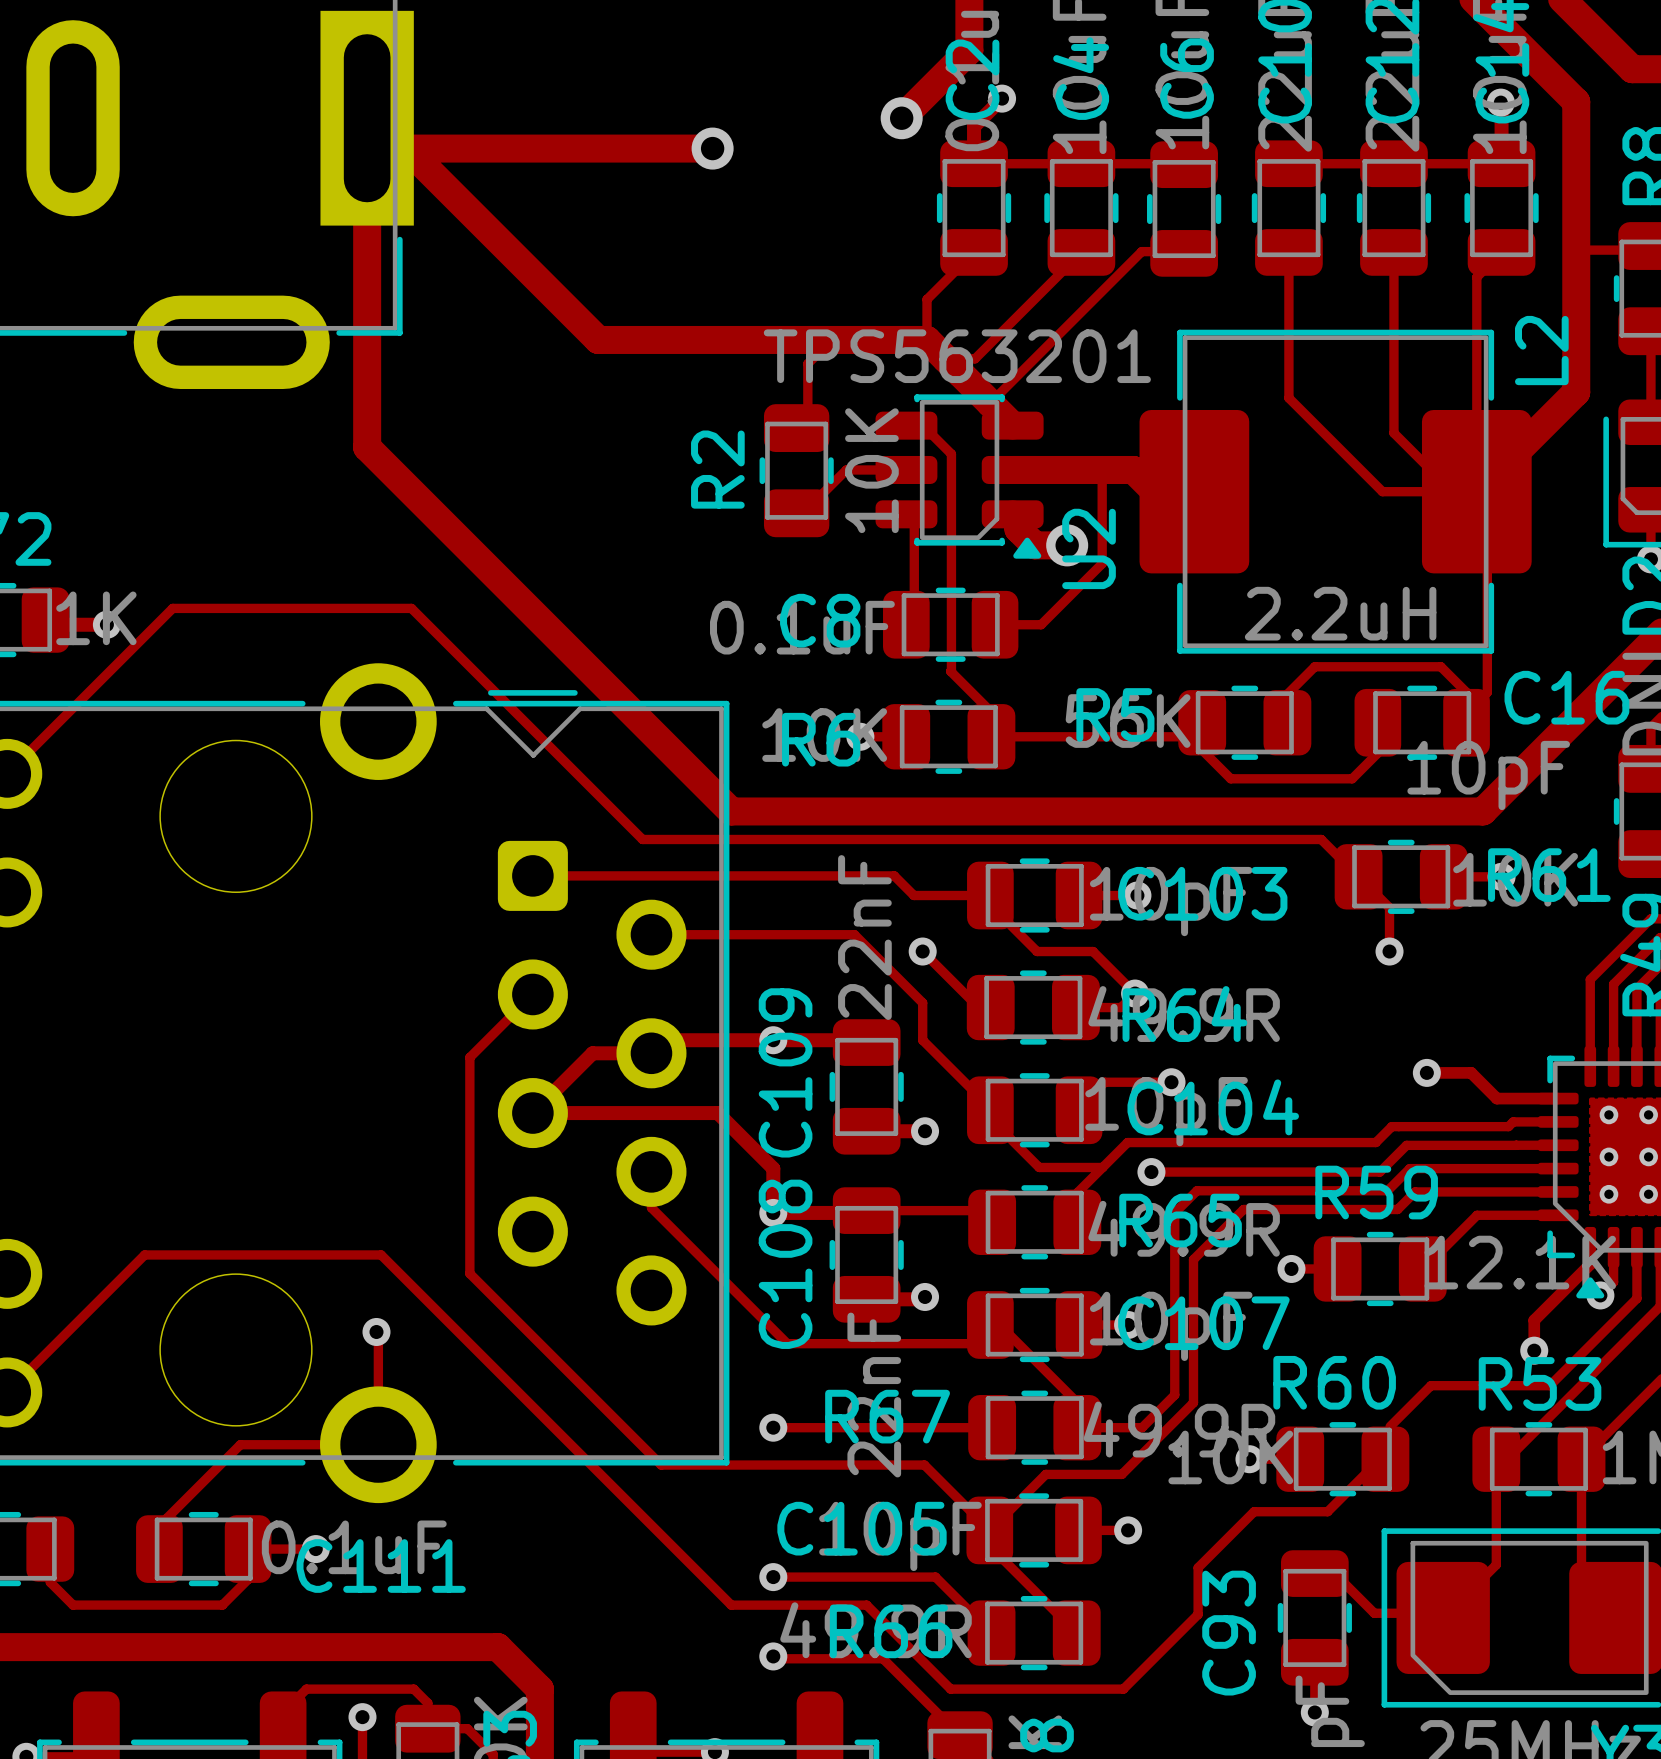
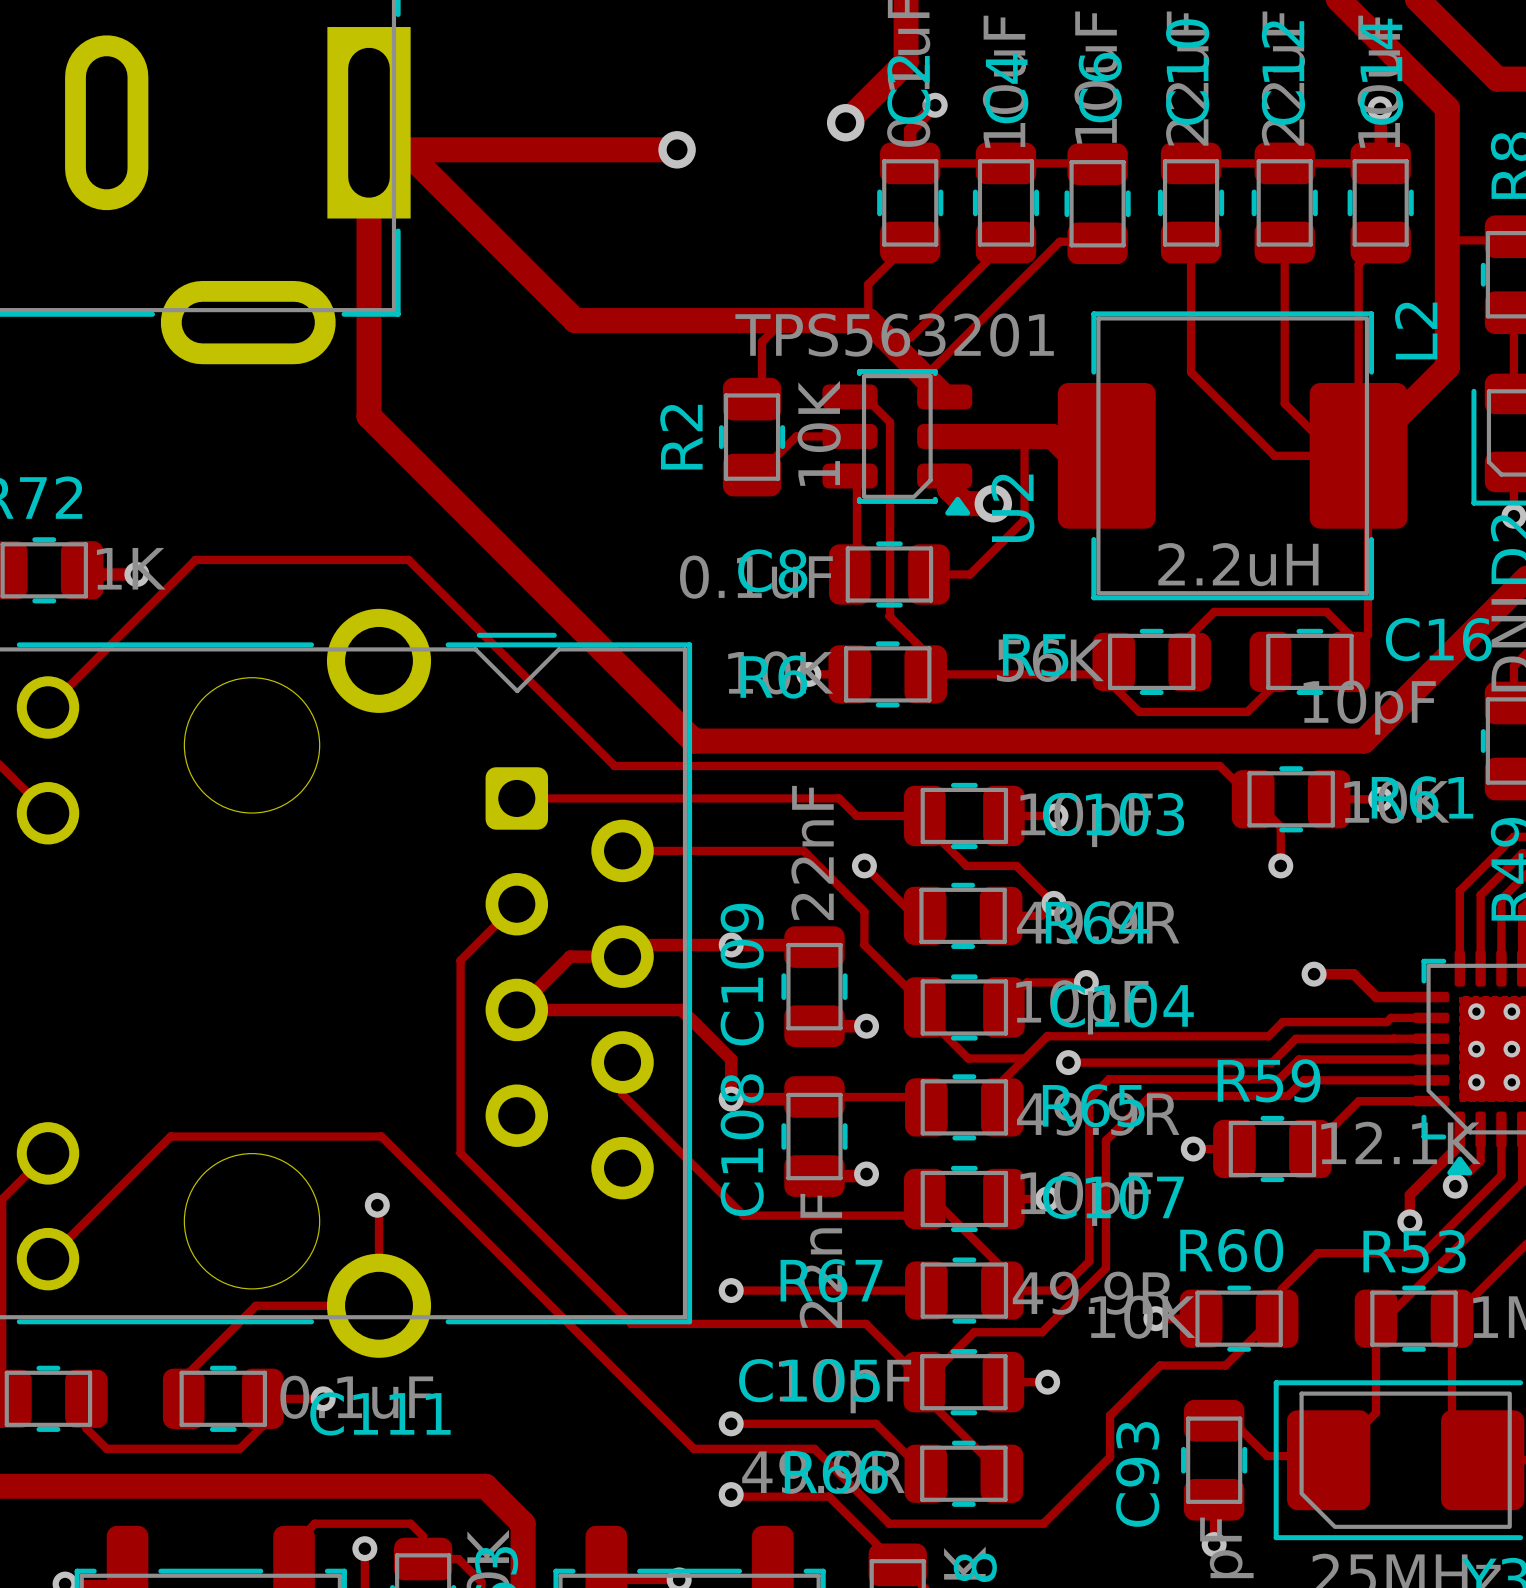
via position: (1600, 1295) -> (1455, 1186)

